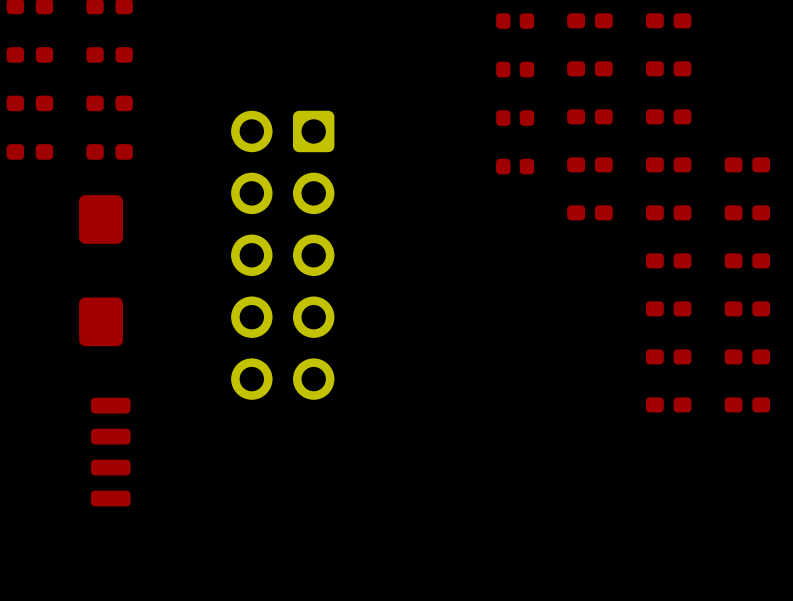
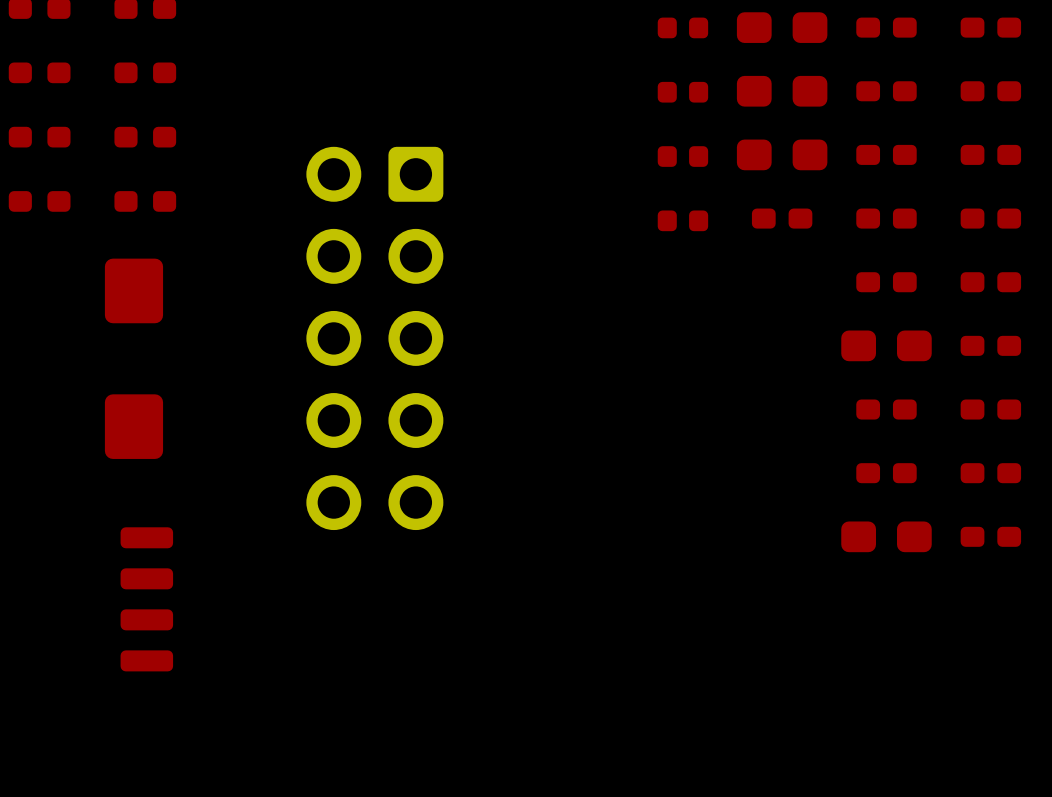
part footprint: [567, 13, 613, 29] -> [736, 12, 828, 43]
part: none -> (990, 27)
part footprint: [567, 61, 613, 77] -> [736, 75, 828, 107]
part: none -> (990, 91)
part footprint: [567, 109, 613, 125] -> [736, 139, 828, 171]
part: none -> (990, 154)
part: (589, 212) -> none
part footprint: [645, 253, 692, 269] -> [841, 330, 932, 362]
part footprint: [645, 397, 692, 413] -> [841, 521, 932, 553]

